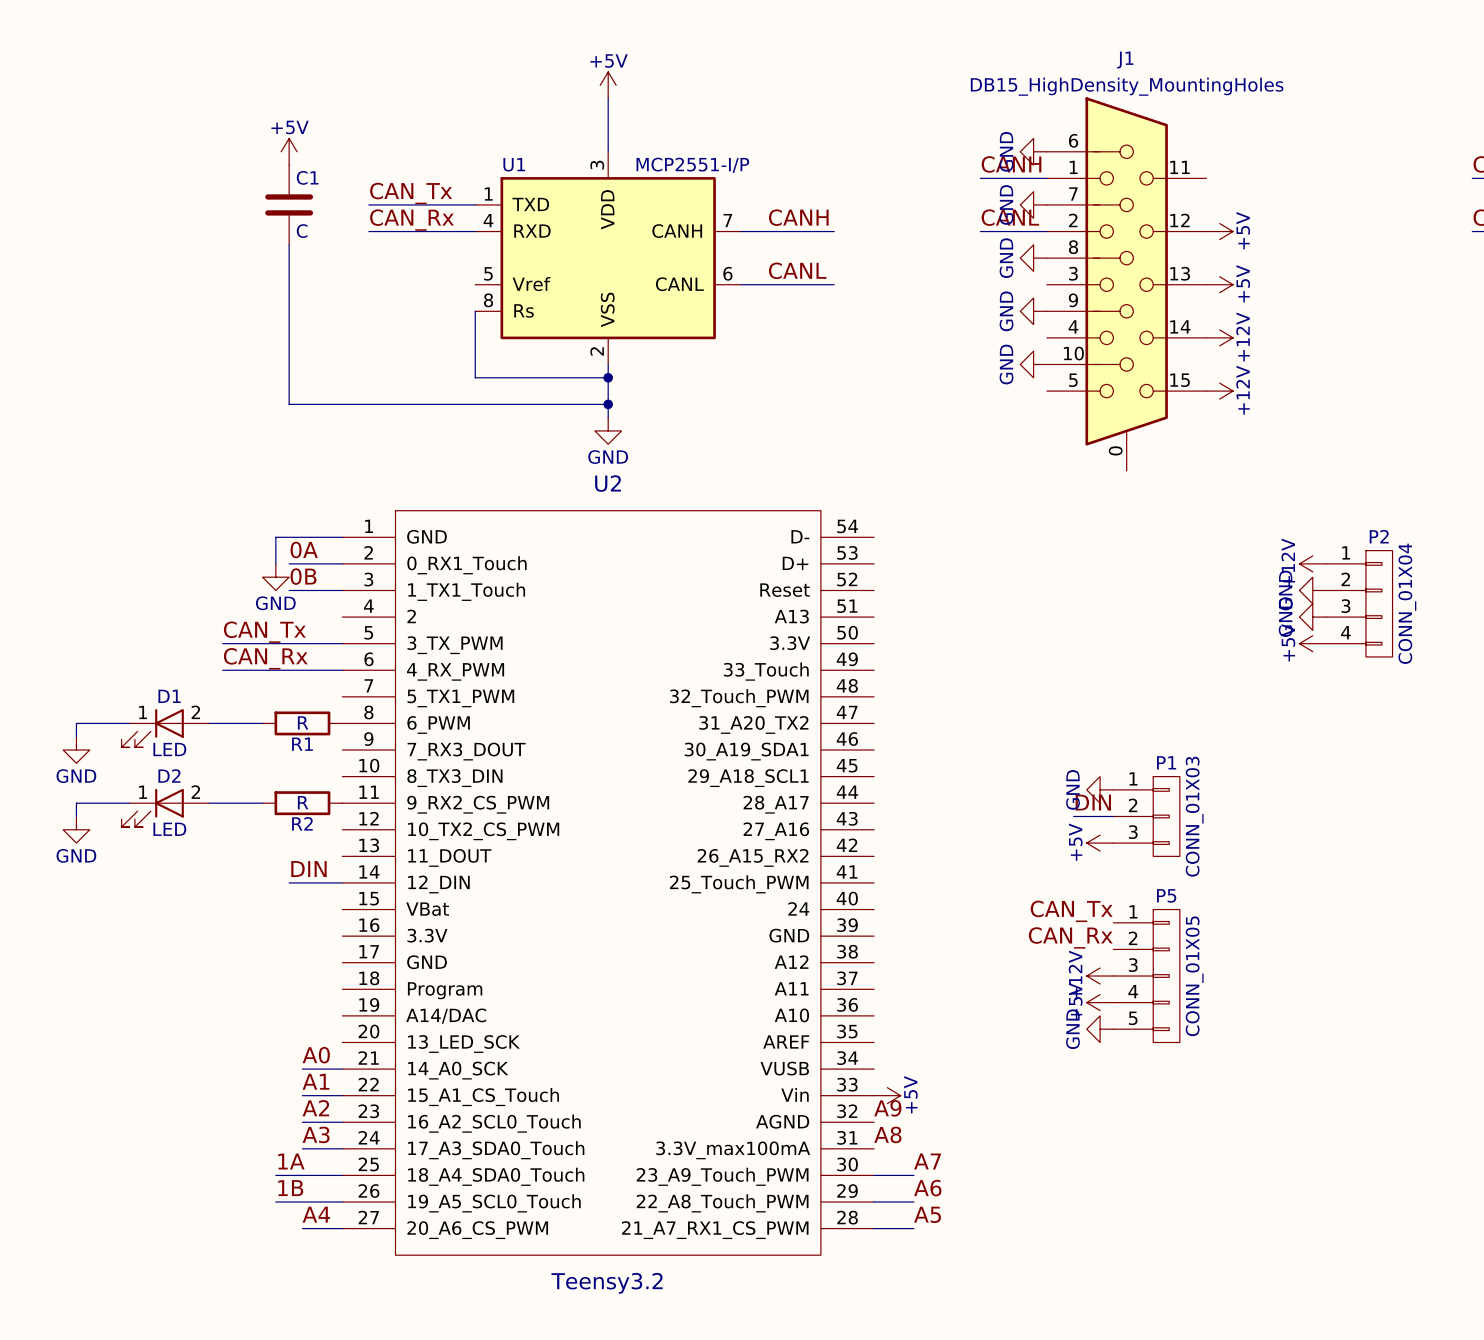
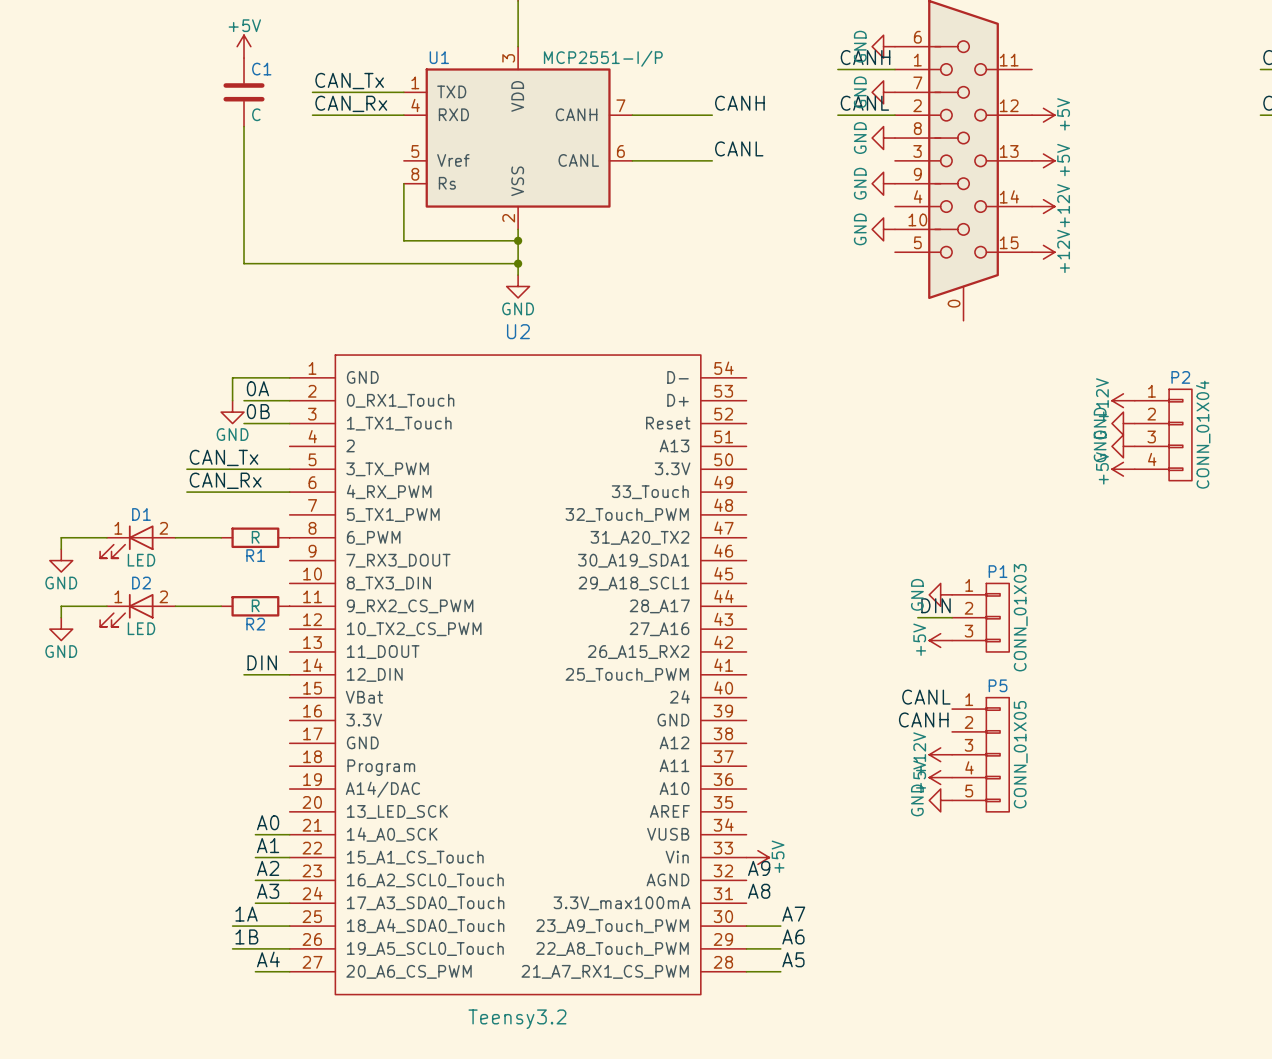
label position: CANH (798, 217) -> CANH (739, 103)
label position: CANL (797, 270) -> CANL (739, 148)
label: CAN_Tx (1071, 911) -> CANL (926, 697)
label: CAN_Rx (1070, 937) -> CANH (923, 719)

